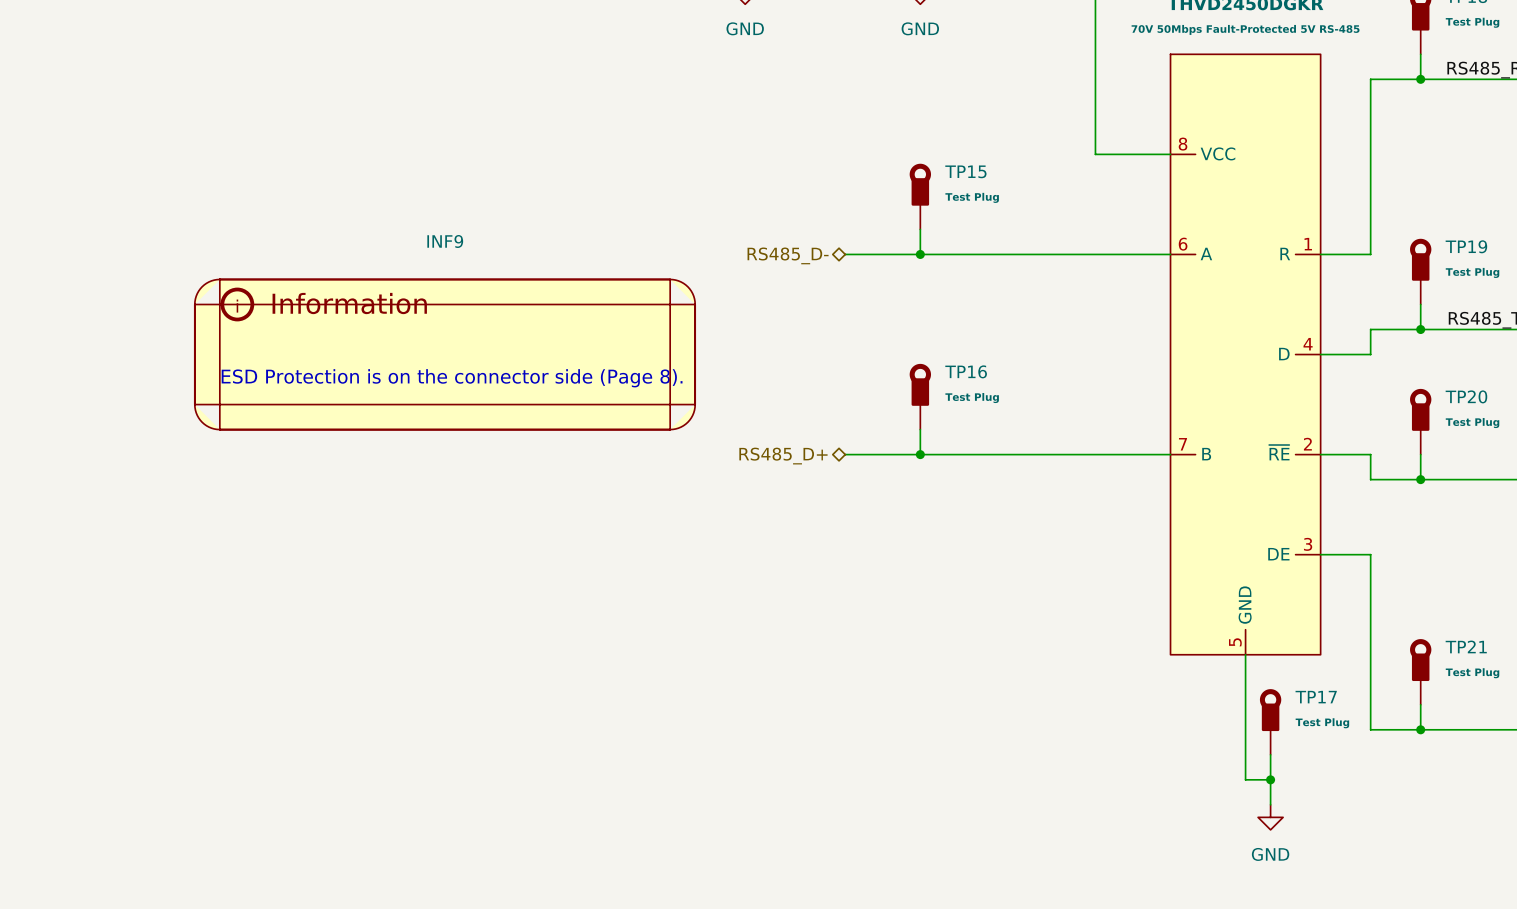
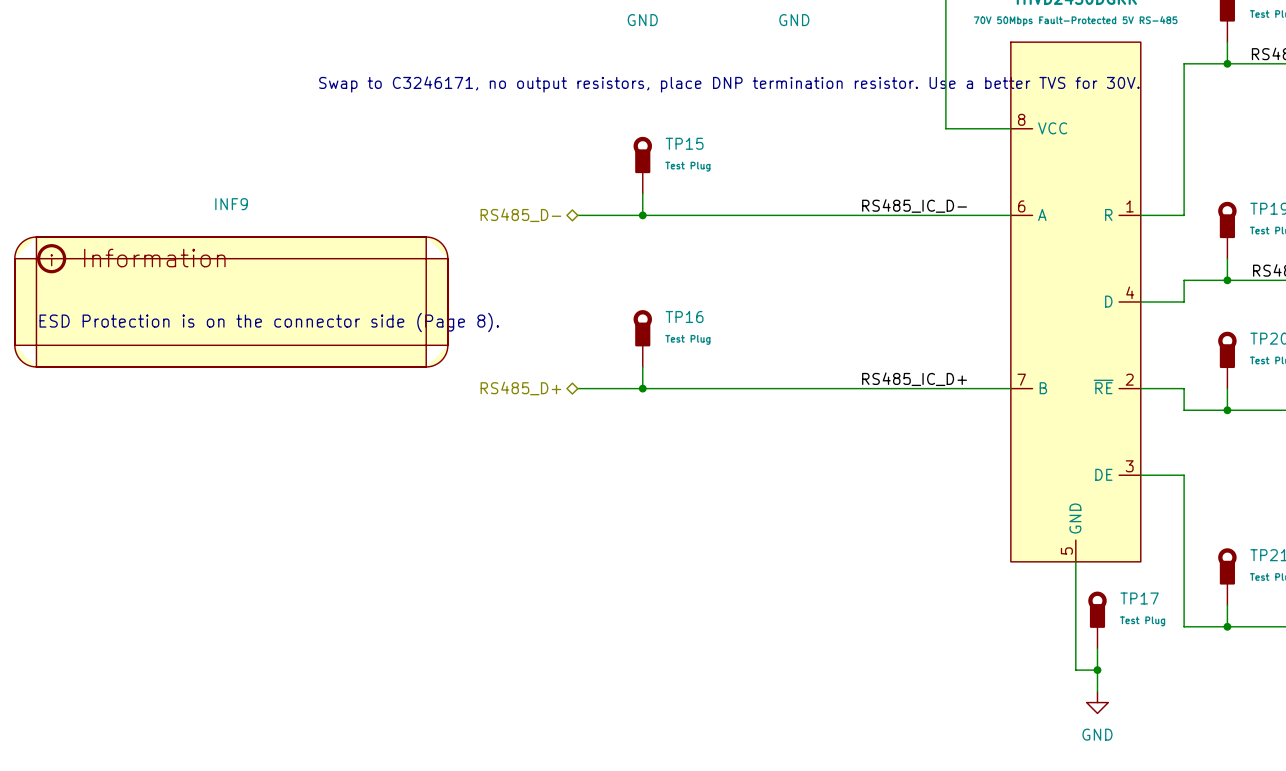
text: none -> Swap to C3246171, no output resistors, place DNP termination resistor. Use a better TVS for 30V. (729, 84)
TP15 position: (920, 196) -> (642, 165)
wire: (920, 229) (920, 254) -> (642, 193) (642, 215)
label: none -> RS485_IC_D- (914, 205)
wire: none -> (577, 215) (729, 215)
junction: none -> (642, 215)
junction: (920, 254) -> none
hierarchical label position: RS485_D- (788, 255) -> RS485_D- (520, 215)
INF9 position: (444, 354) -> (231, 301)
text position: ESD Protection is on the connector side (Page 8). (452, 378) -> ESD Protection is on the connector side (Page 8). (269, 322)
TP16 position: (920, 396) -> (642, 338)
wire: (920, 429) (920, 454) -> (642, 366) (642, 388)
label: none -> RS485_IC_D+ (914, 379)
wire: none -> (577, 388) (729, 388)
junction: none -> (642, 388)
junction: (920, 454) -> none
hierarchical label position: RS485_D+ (783, 456) -> RS485_D+ (520, 388)

